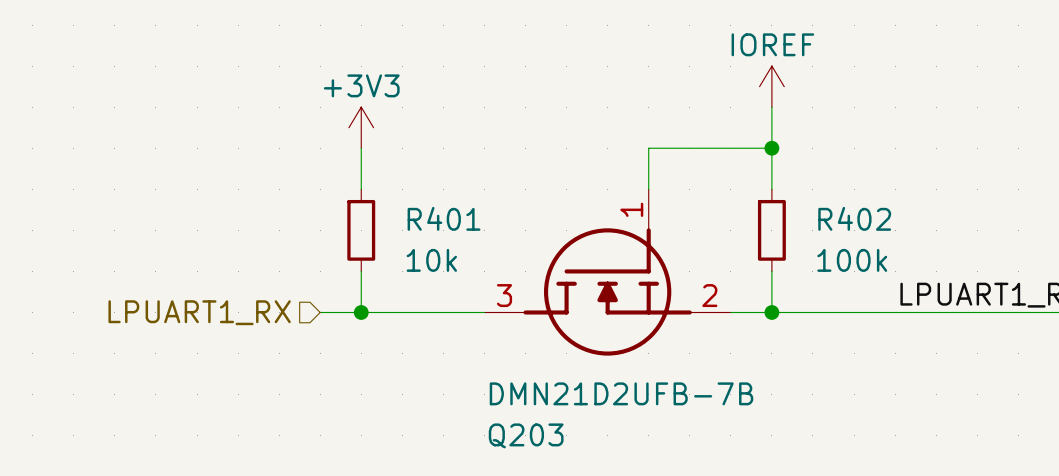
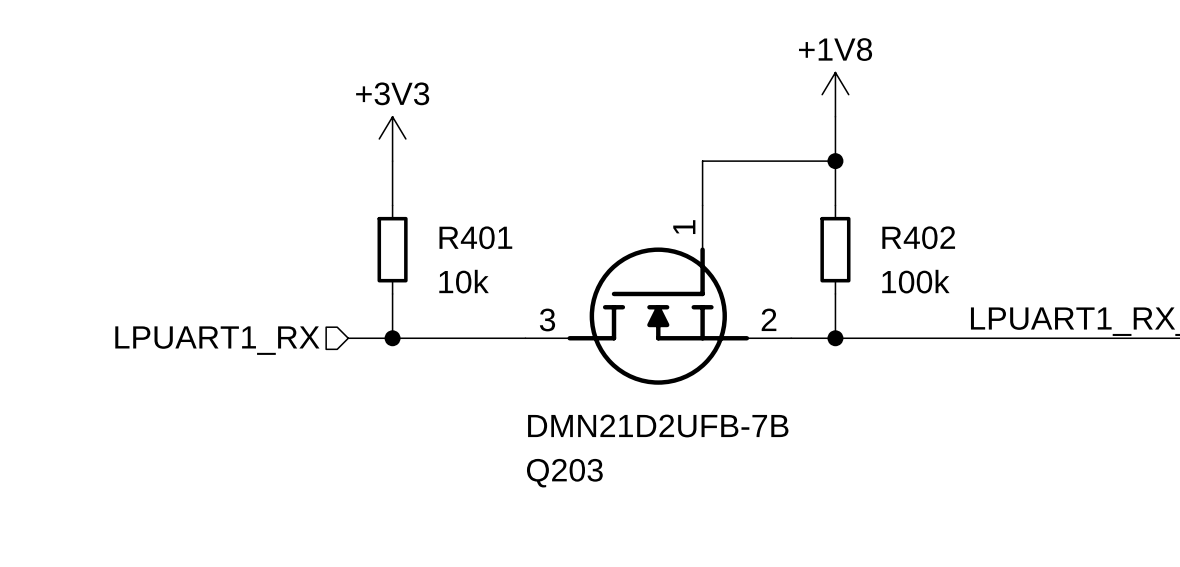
power symbol: IOREF (771, 86) -> +1V8 (835, 94)

